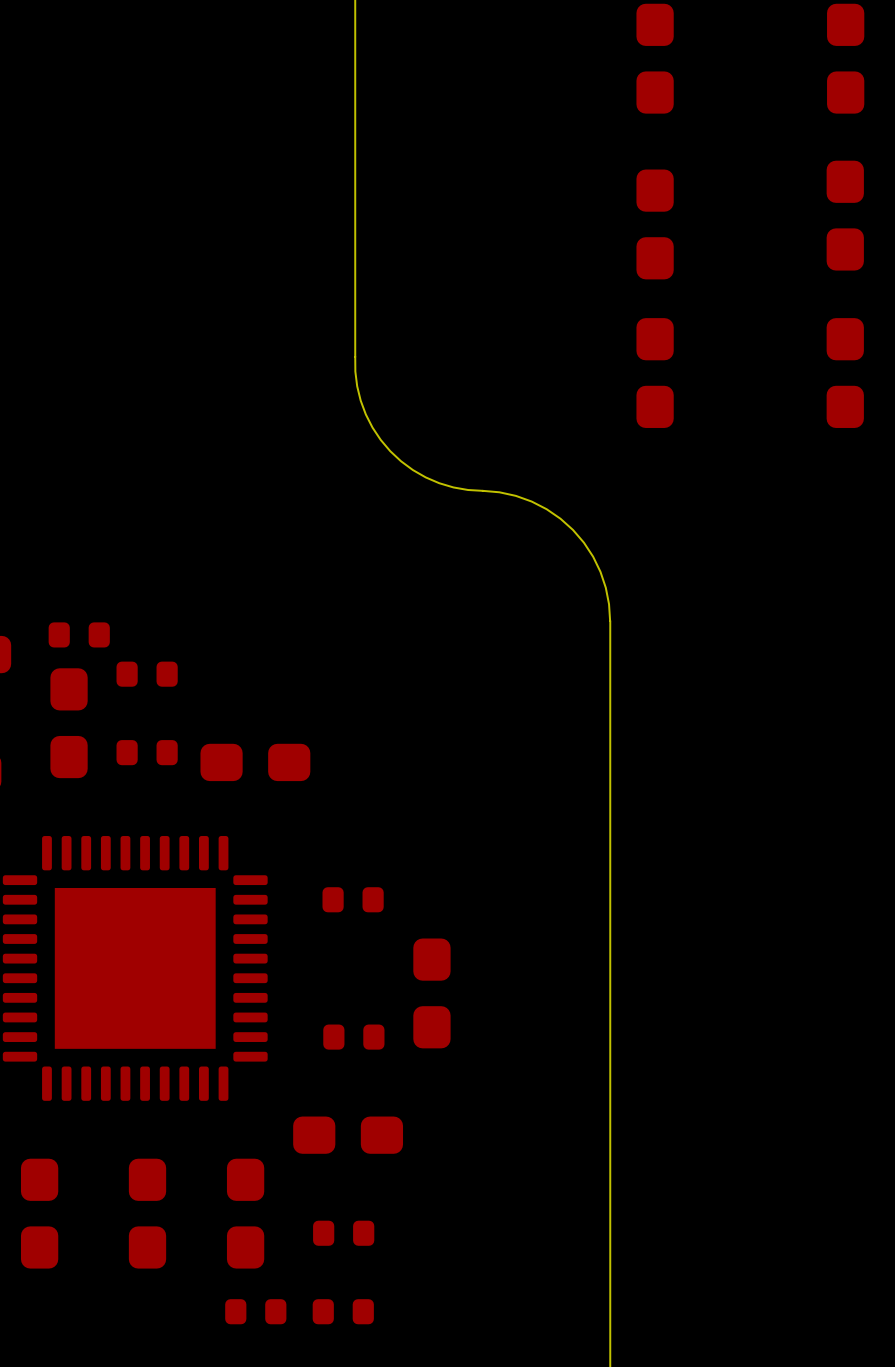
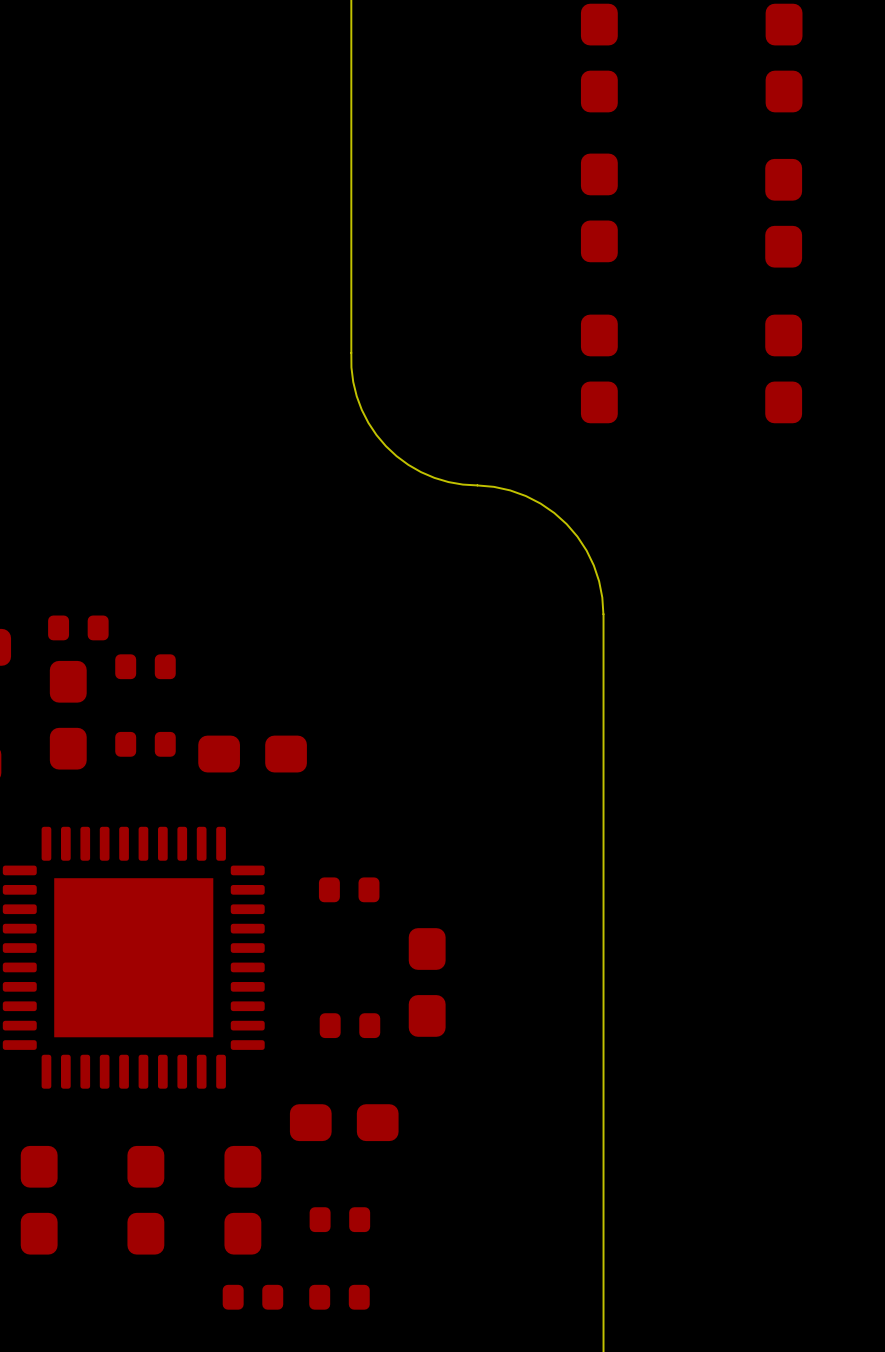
part position: (655, 58) -> (599, 58)
part position: (845, 58) -> (784, 58)
part position: (845, 215) -> (783, 213)
part position: (655, 224) -> (599, 207)
part position: (655, 373) -> (599, 368)
part position: (845, 373) -> (783, 368)

